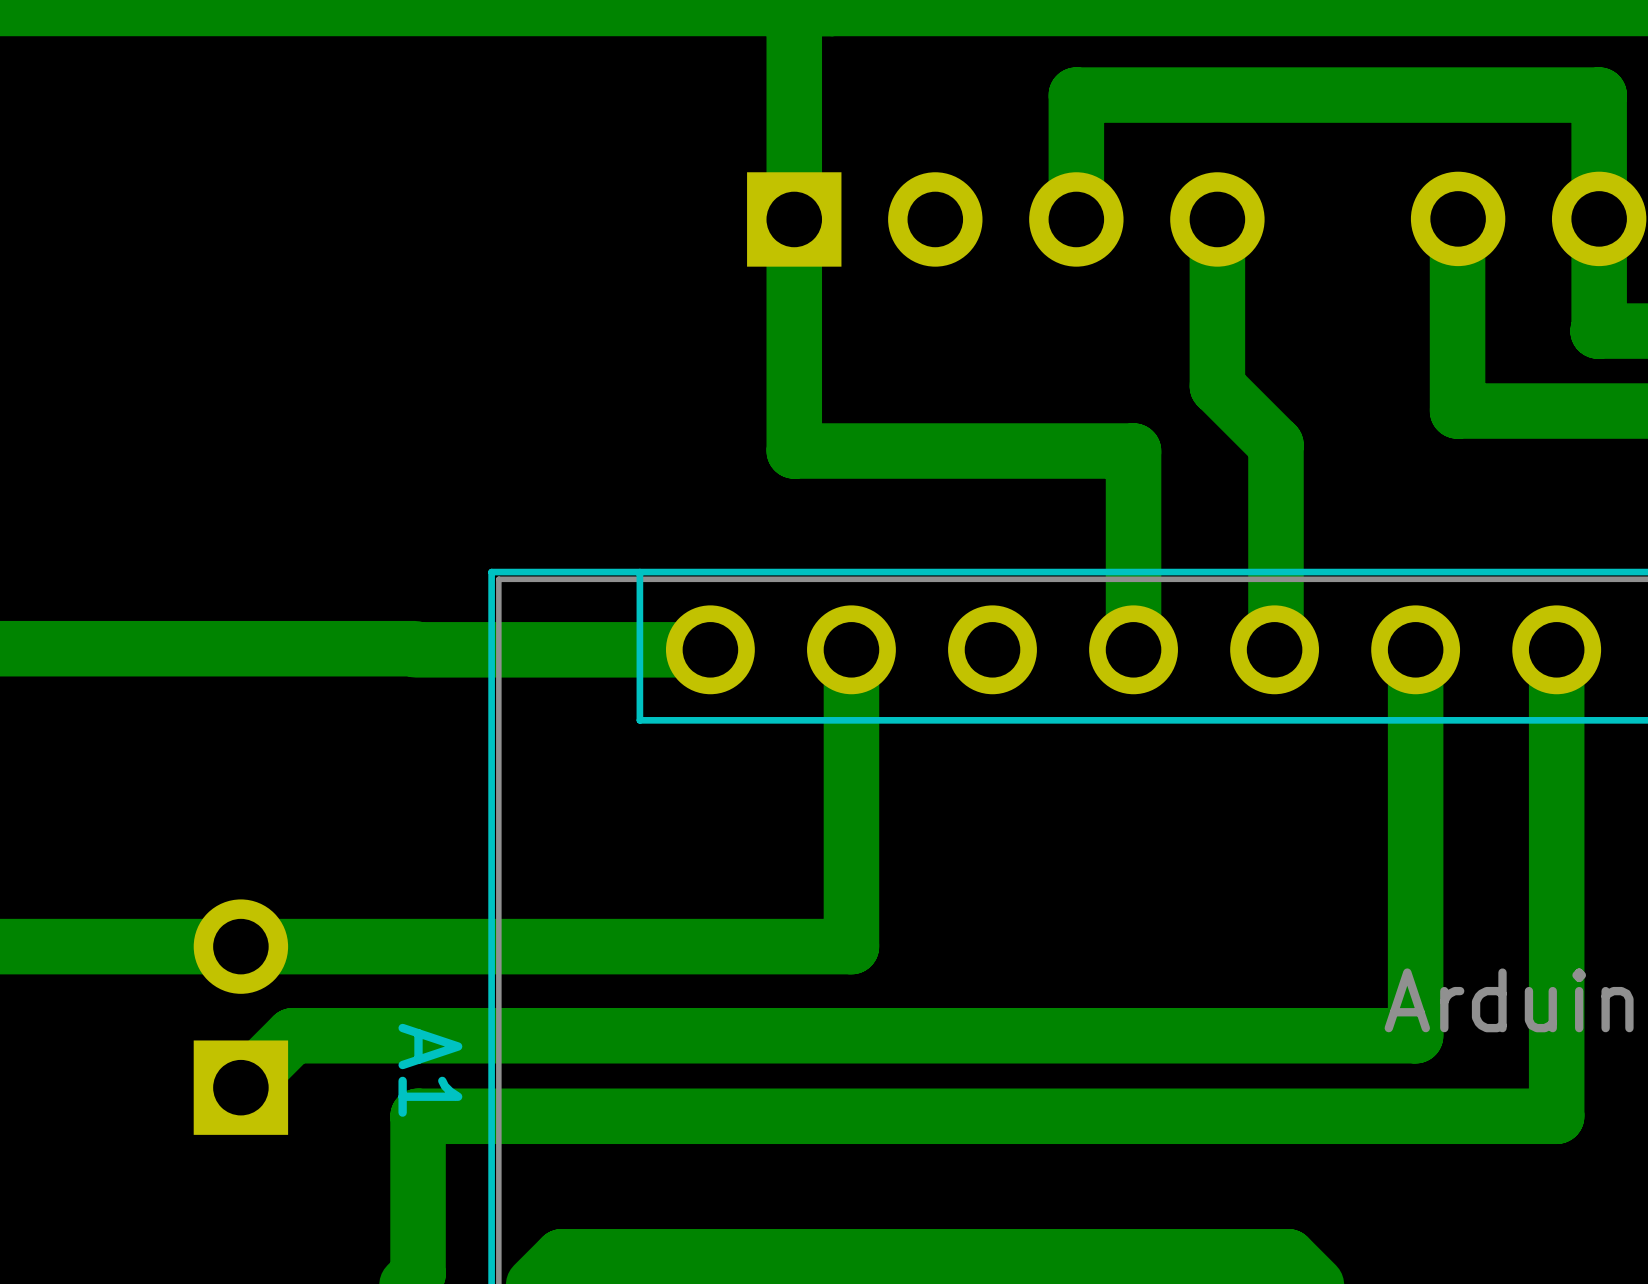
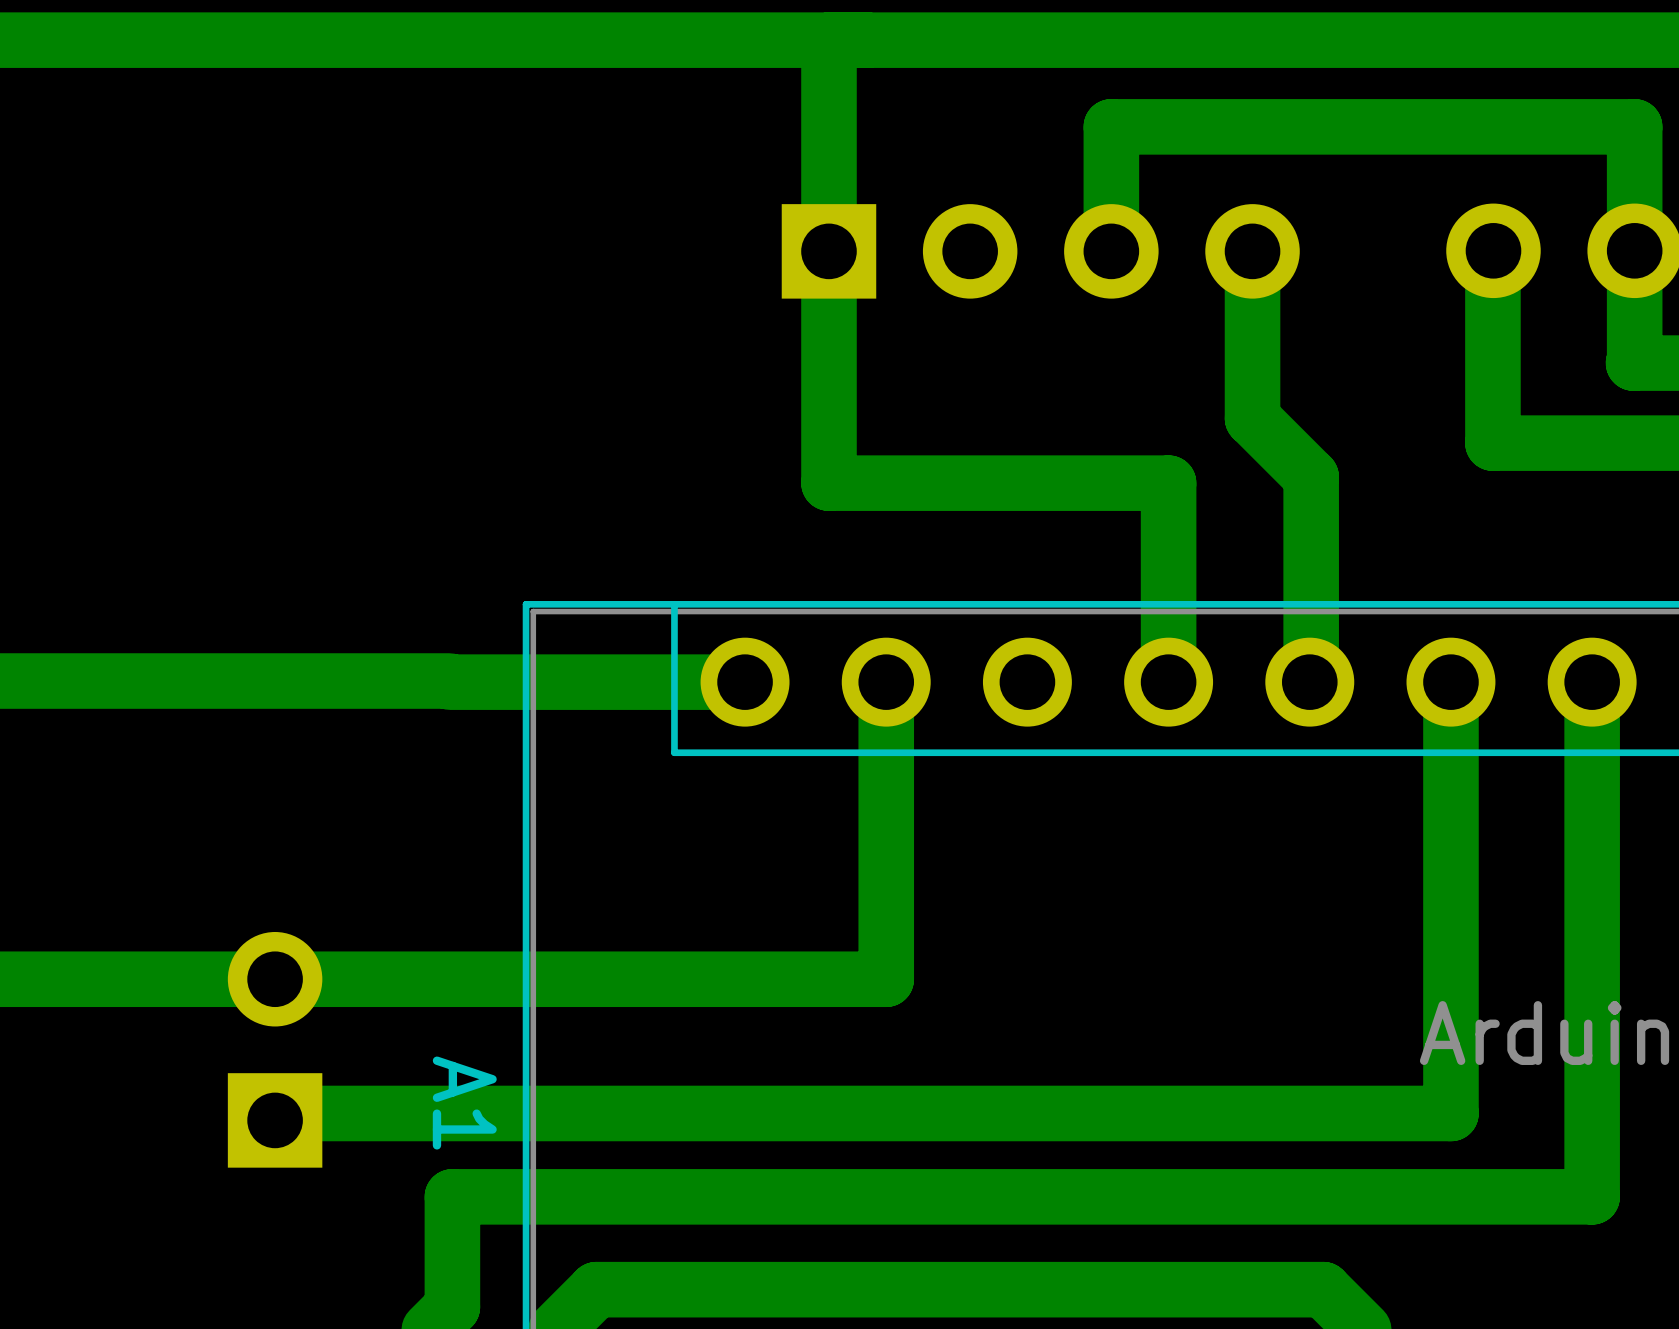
track: (1415, 1035) (292, 1035) (247, 1080) -> (1450, 1068) (1450, 1113) (282, 1113)
track: (1556, 1116) (418, 1116) (418, 1164) -> (1592, 1149) (1592, 1196) (452, 1196)

